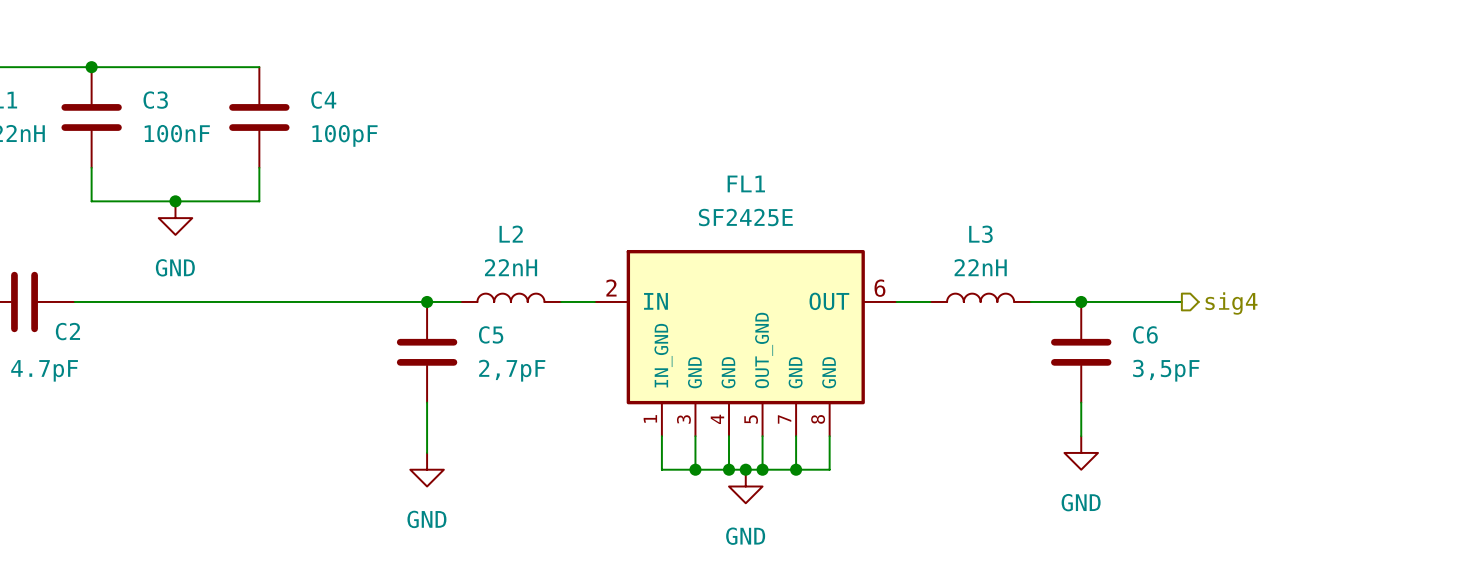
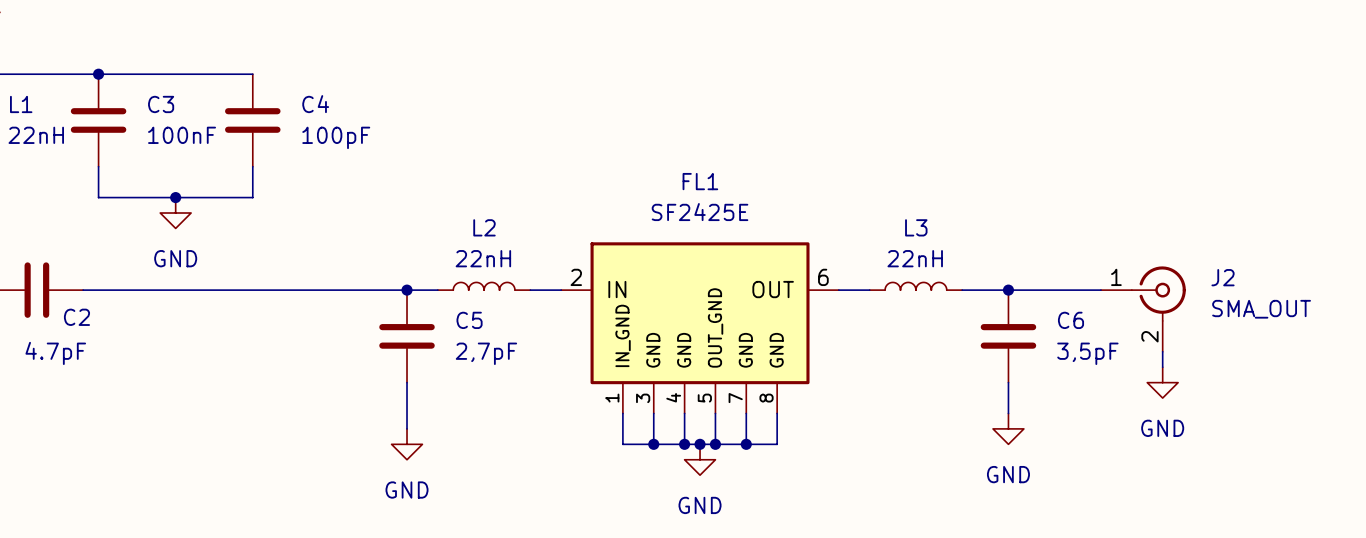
hierarchical label: sig4 (1231, 303) -> none
J2: none -> SMA_OUT (1143, 309)
wire: none -> (1162, 351) (1162, 367)
power symbol: none -> GND (1162, 382)

